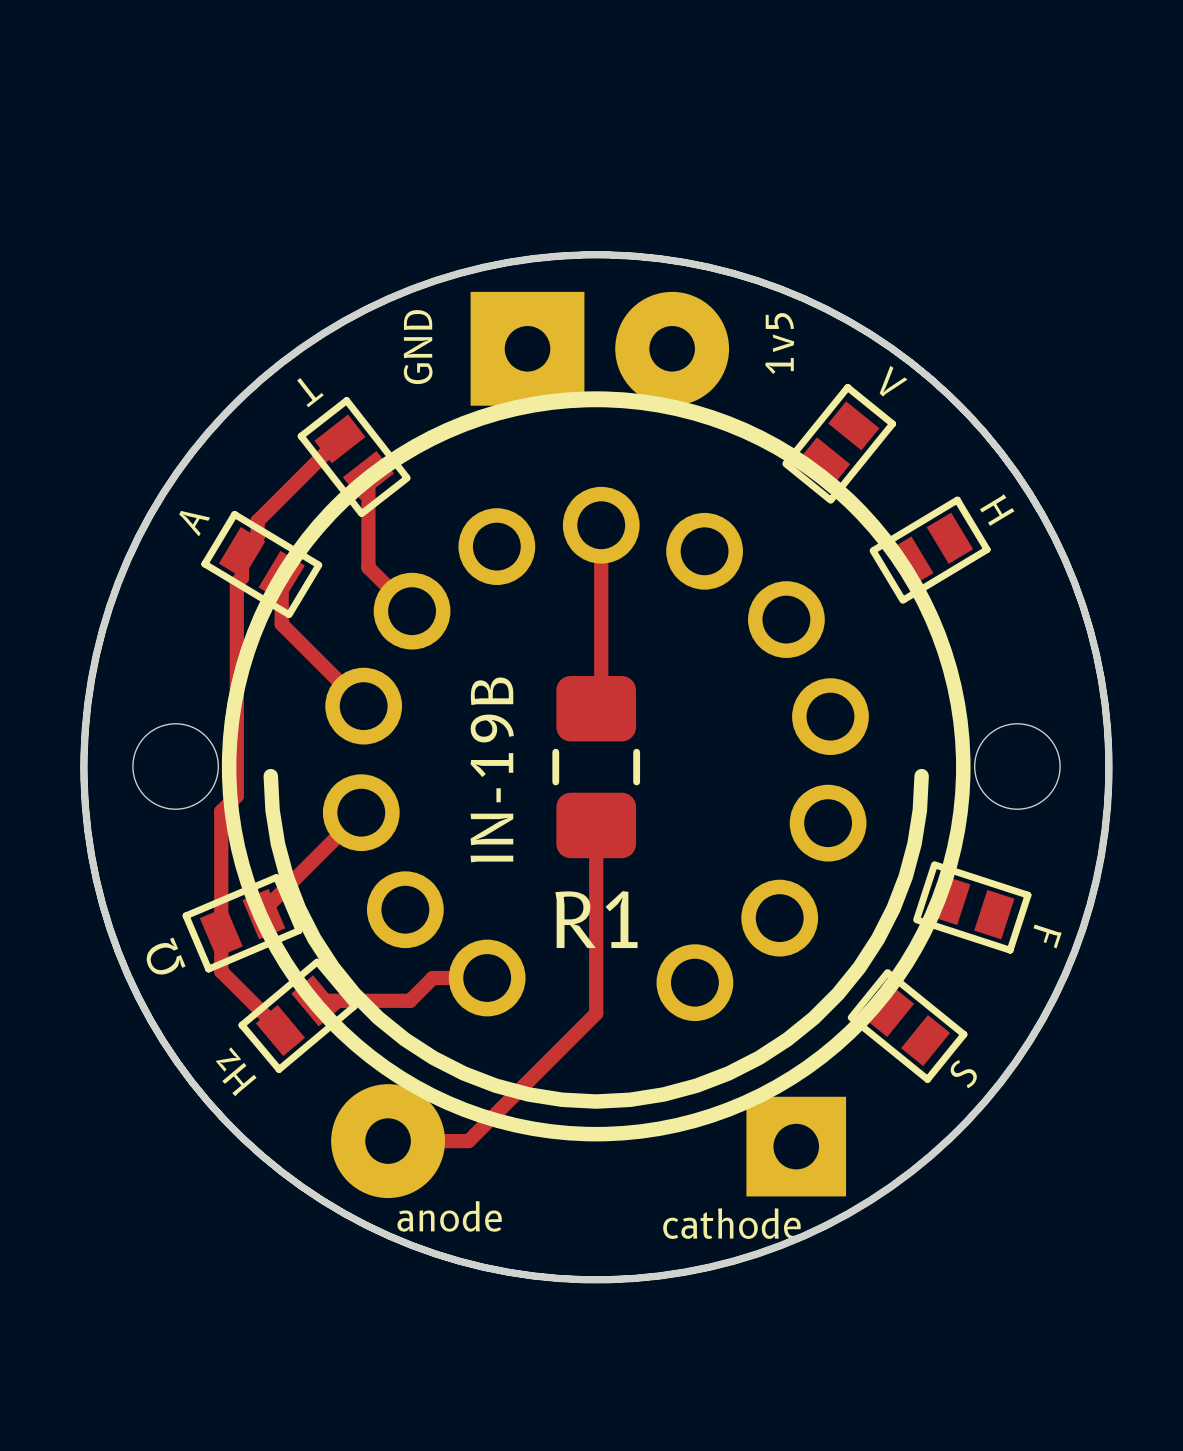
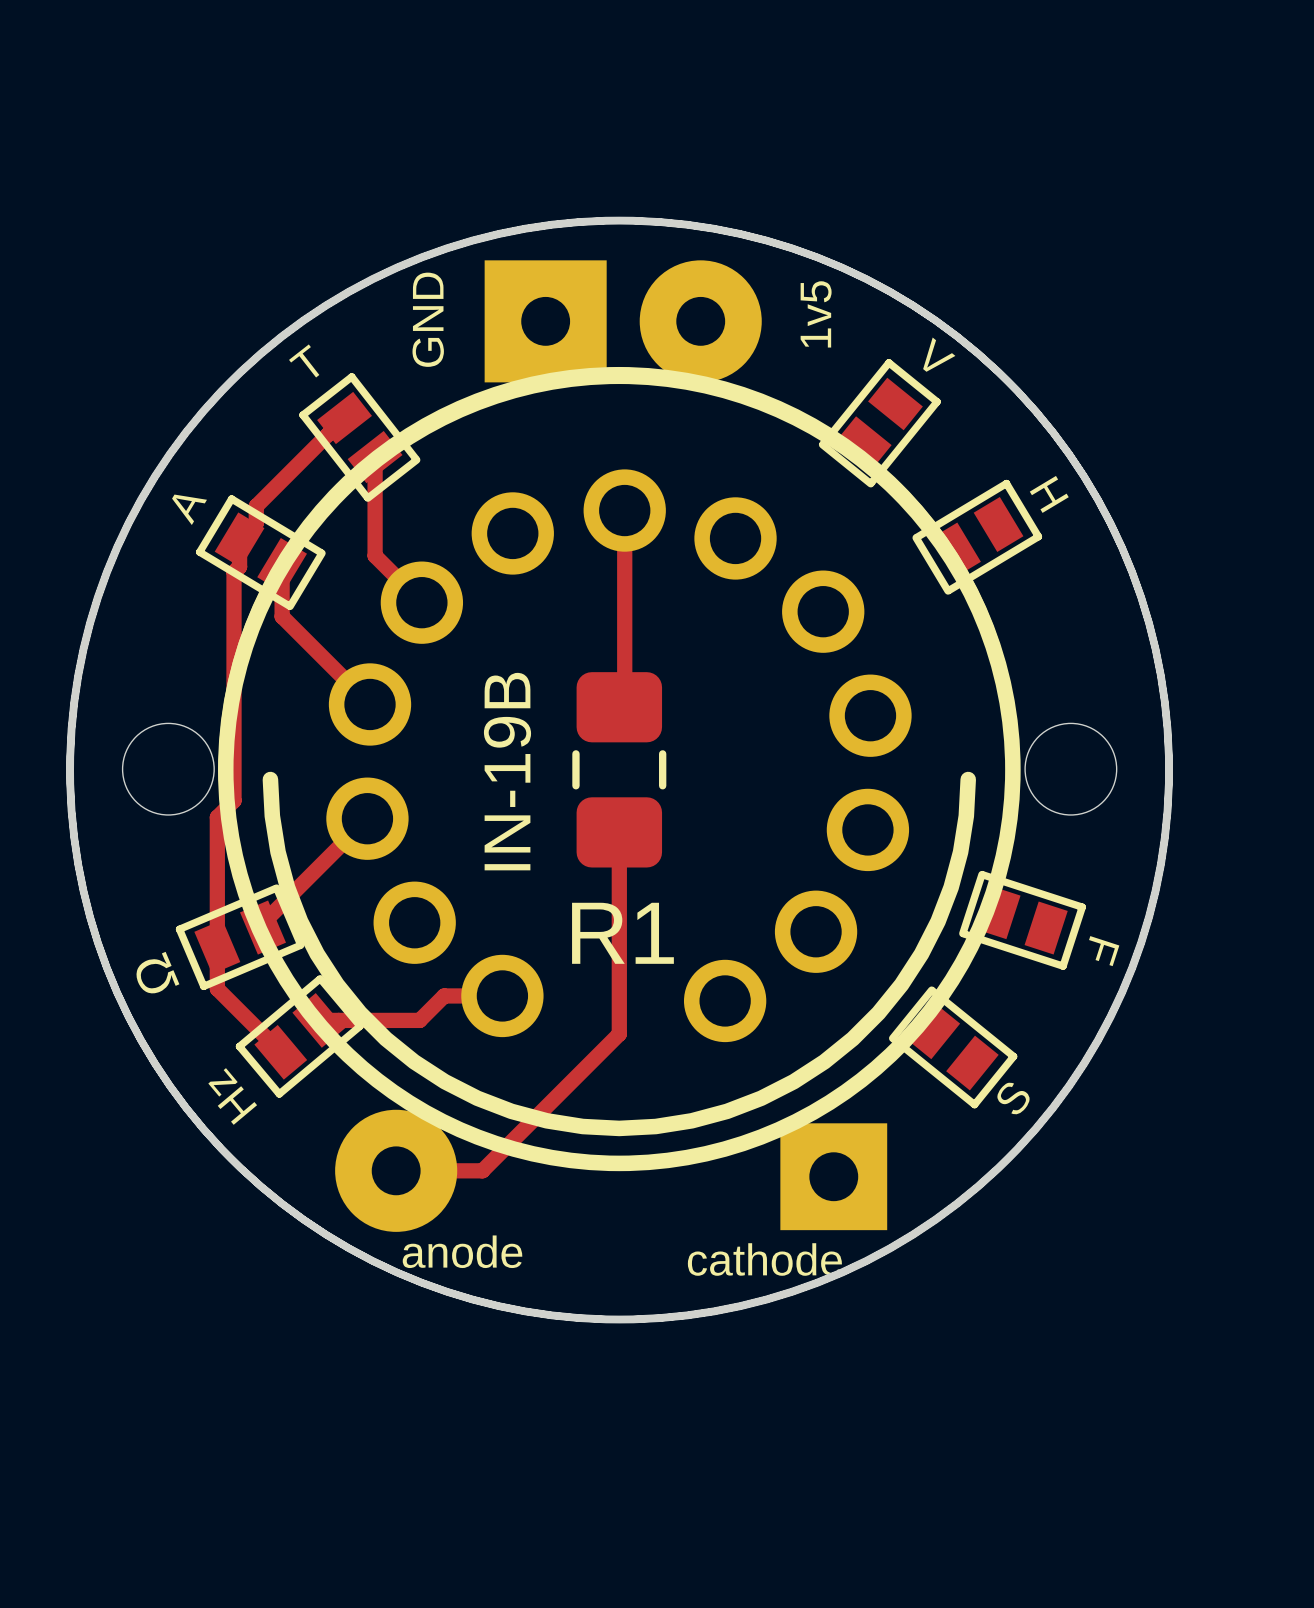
T name rotation: 0° (310, 392) -> 180° (304, 360)

